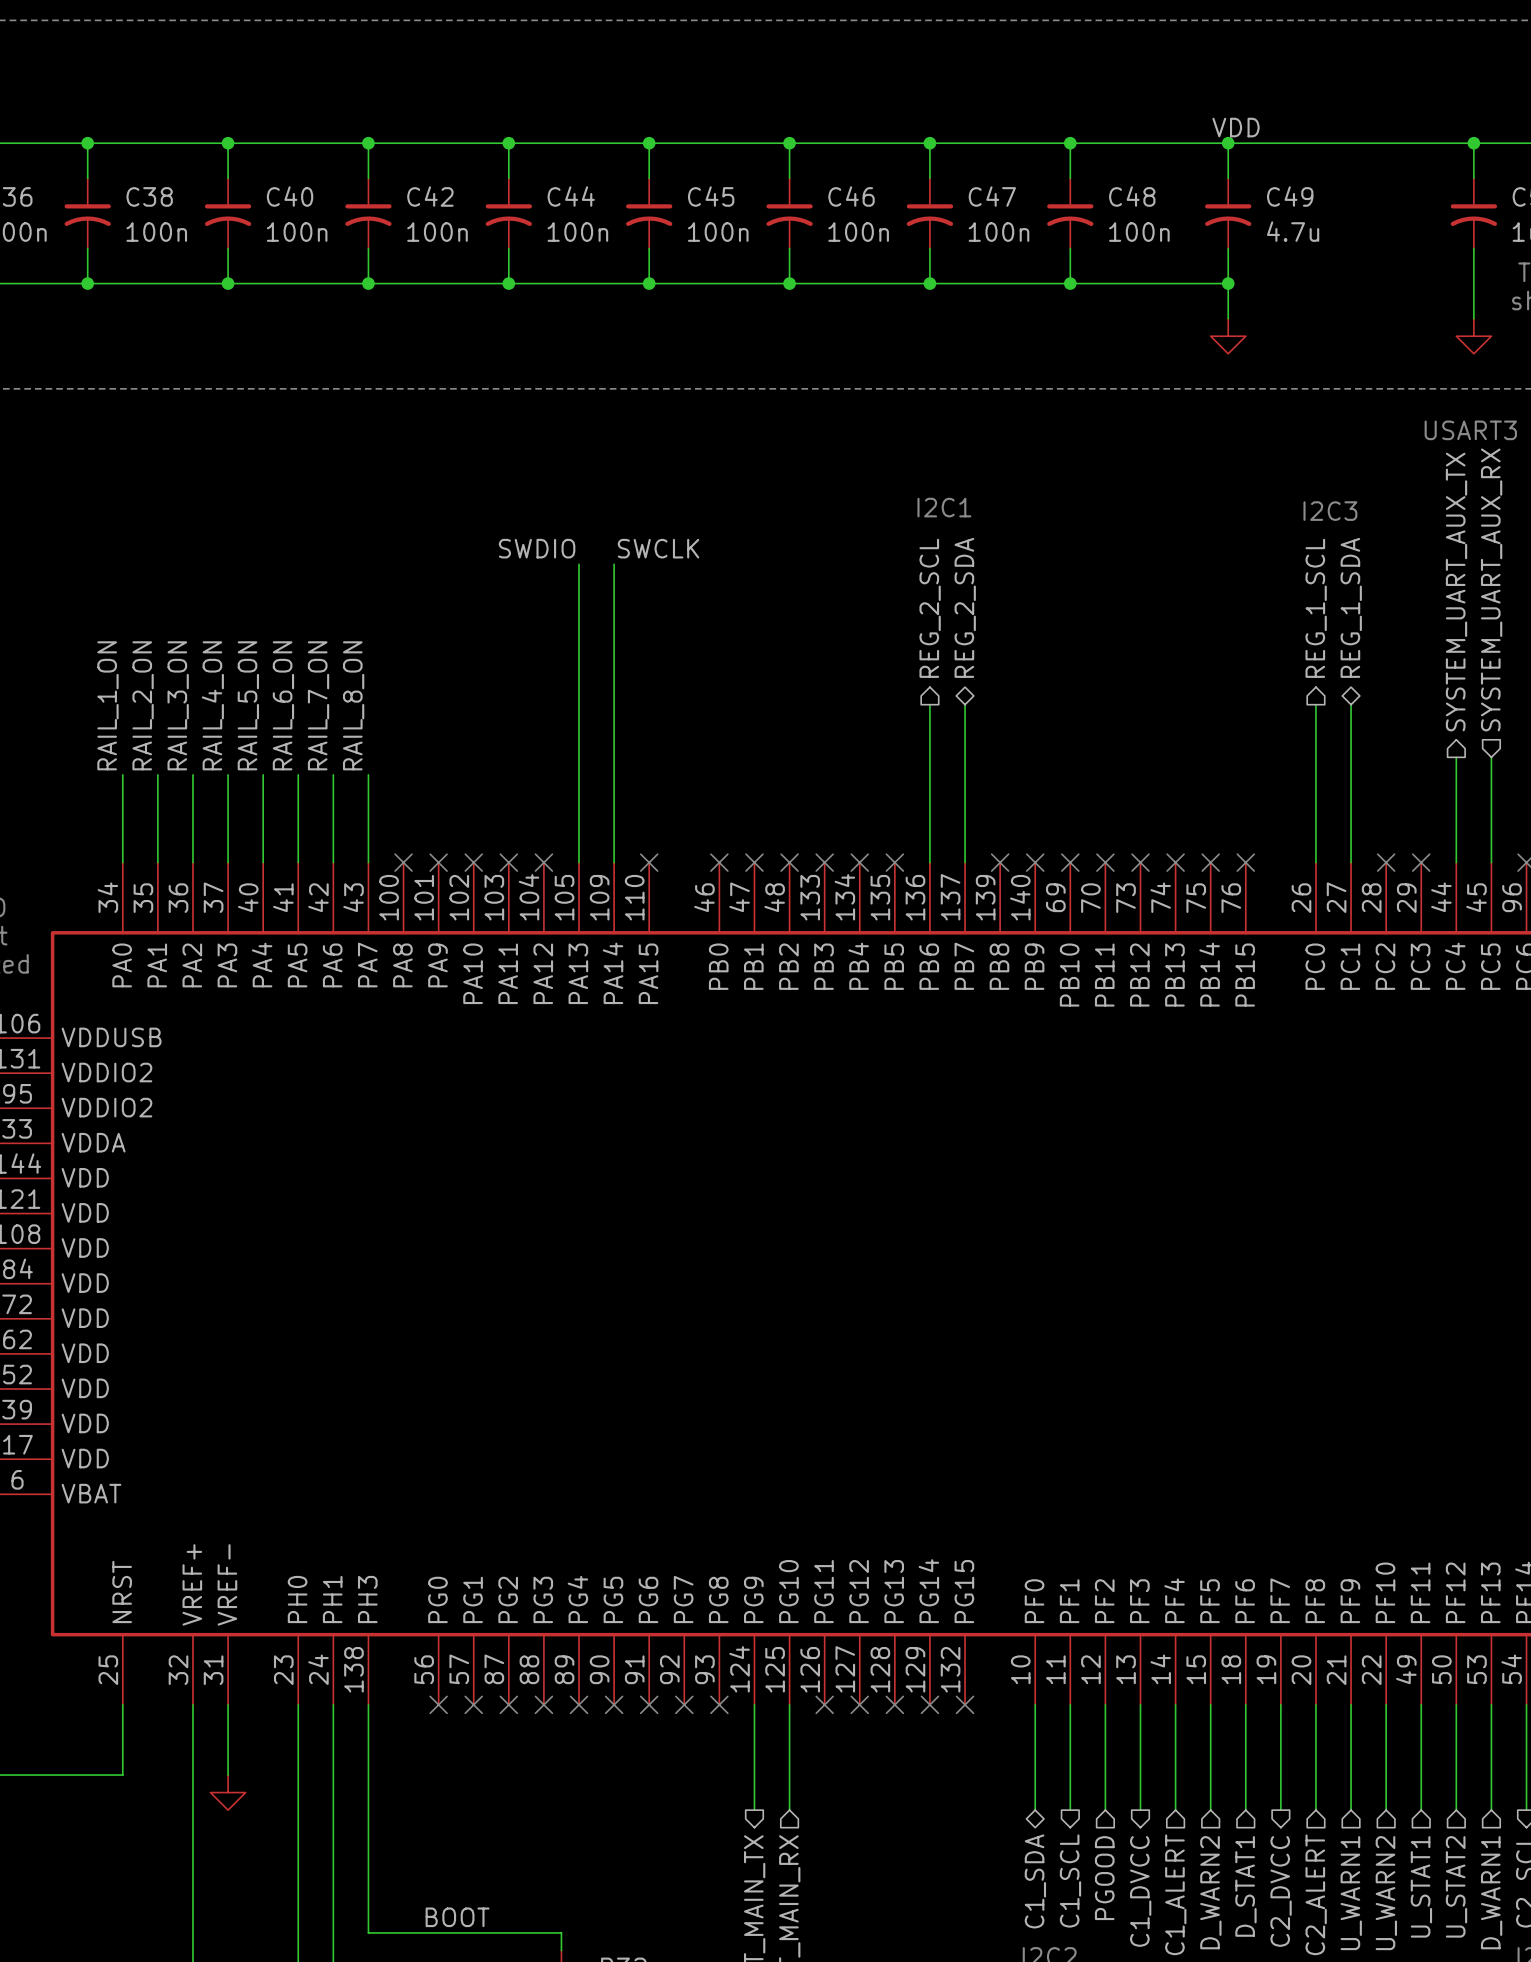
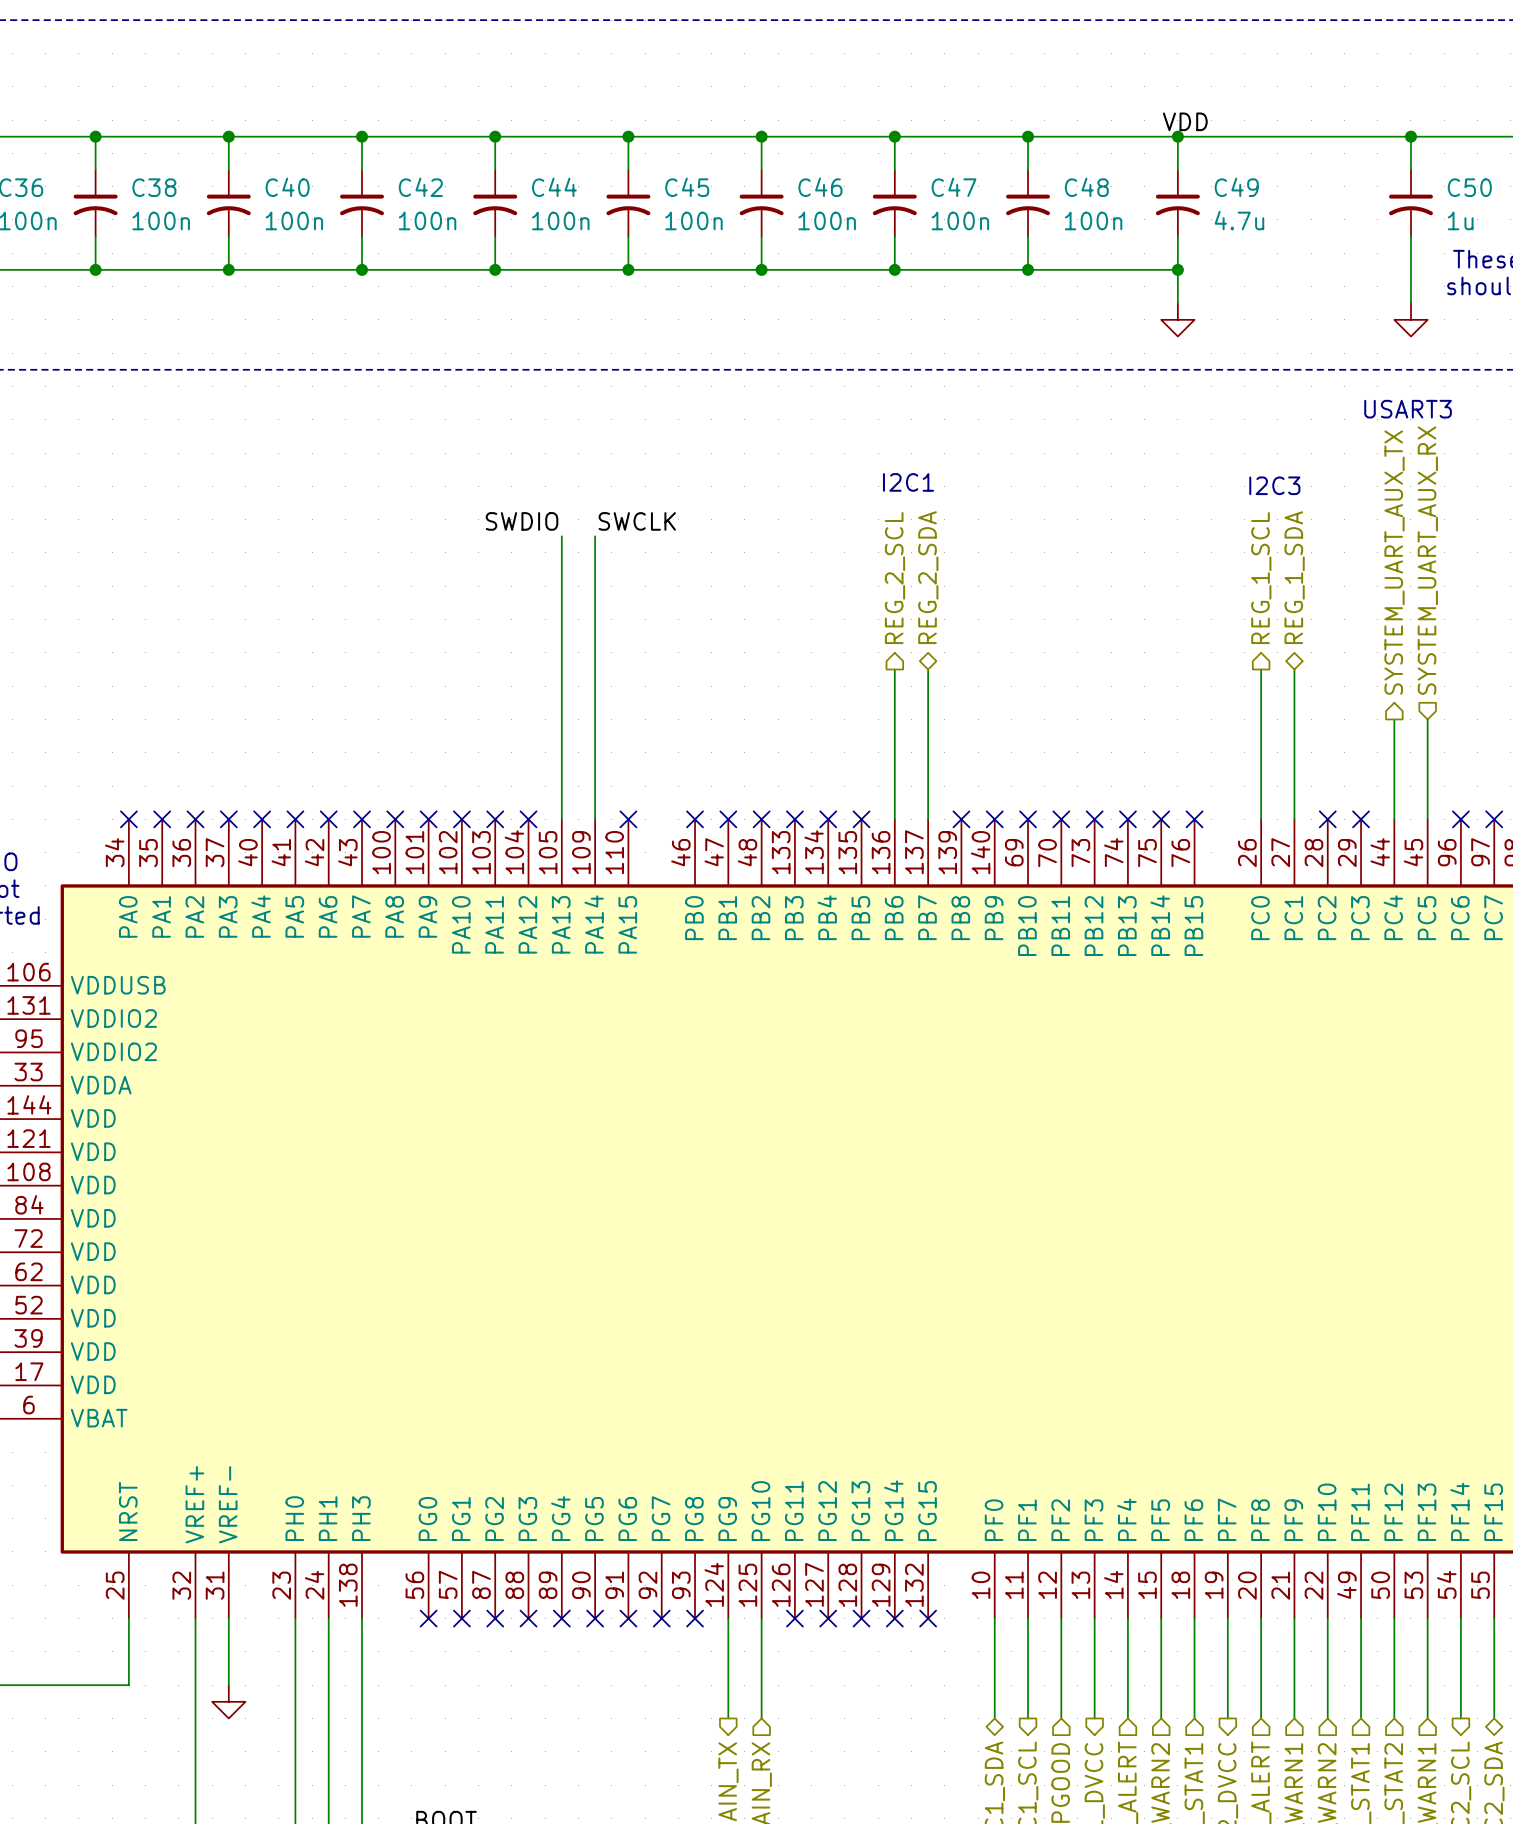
label: RAIL_1_ON (107, 705) -> none
label: RAIL_2_ON (143, 705) -> none
label: RAIL_3_ON (178, 705) -> none
label: RAIL_4_ON (212, 705) -> none
label: RAIL_5_ON (248, 705) -> none
label: RAIL_6_ON (283, 705) -> none
label: RAIL_7_ON (318, 705) -> none
label: RAIL_8_ON (353, 705) -> none
wire: (122, 774) (122, 862) -> none
wire: (157, 774) (157, 862) -> none
wire: (192, 774) (192, 862) -> none
wire: (228, 774) (228, 862) -> none
wire: (263, 774) (263, 862) -> none
wire: (298, 774) (298, 862) -> none
wire: (333, 774) (333, 862) -> none
wire: (368, 774) (368, 862) -> none
no-connect mark: none -> (128, 819)
no-connect mark: none -> (162, 819)
no-connect mark: none -> (195, 819)
no-connect mark: none -> (228, 819)
no-connect mark: none -> (262, 819)
no-connect mark: none -> (295, 819)
no-connect mark: none -> (328, 819)
no-connect mark: none -> (362, 819)

